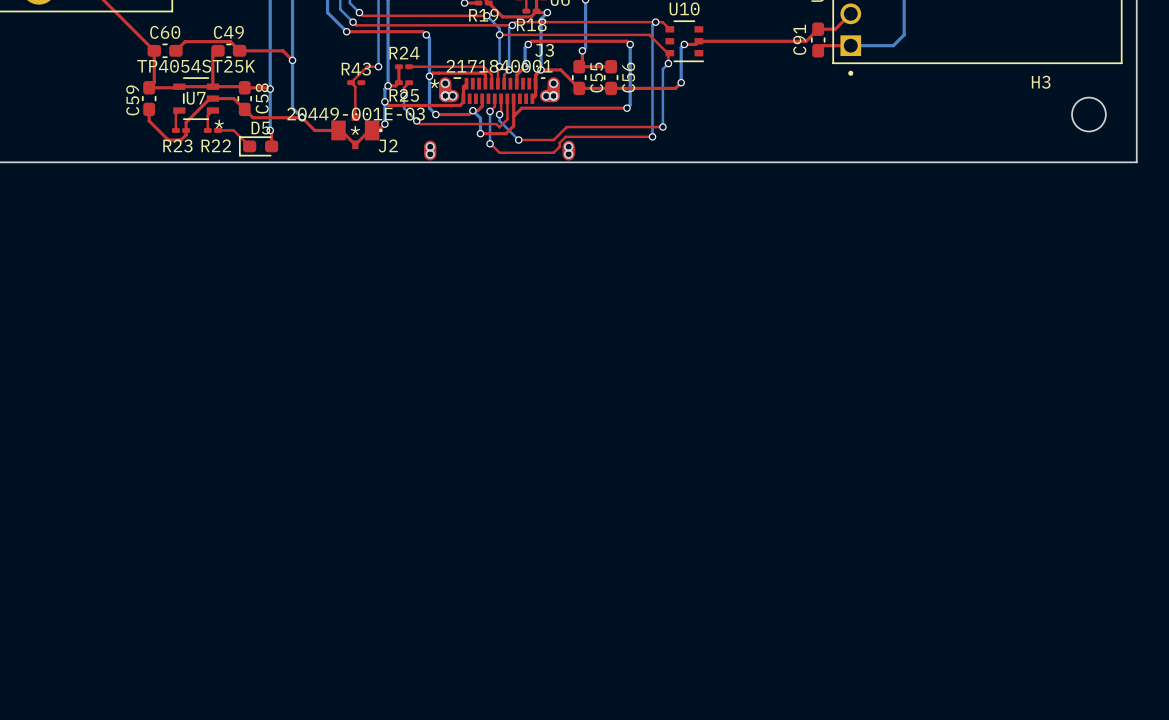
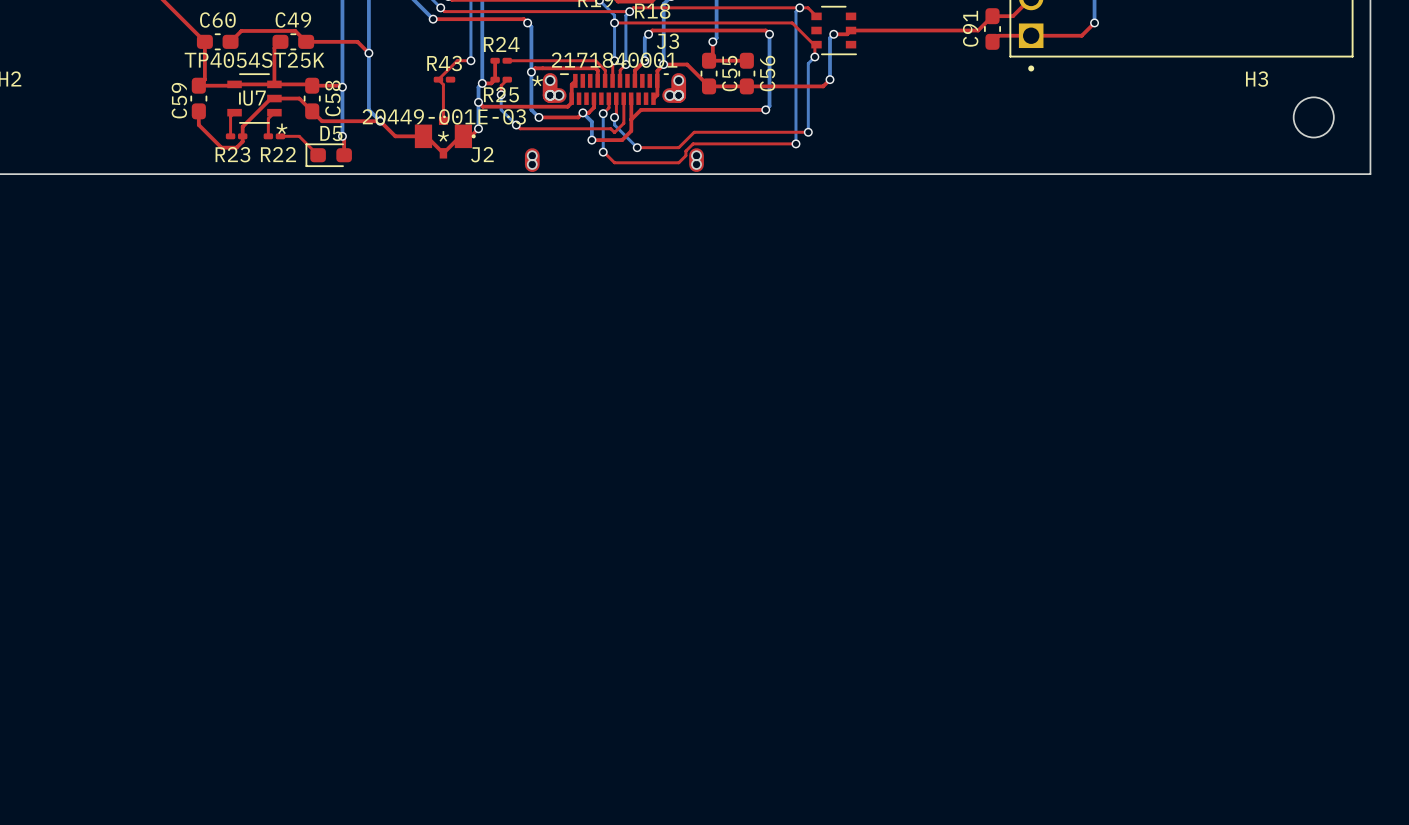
top track: none -> (1094, 22) (1081, 35) (1031, 35)
bottom track: (904, 34) (893, 45) (850, 45) -> none
via: none -> (1094, 22)

